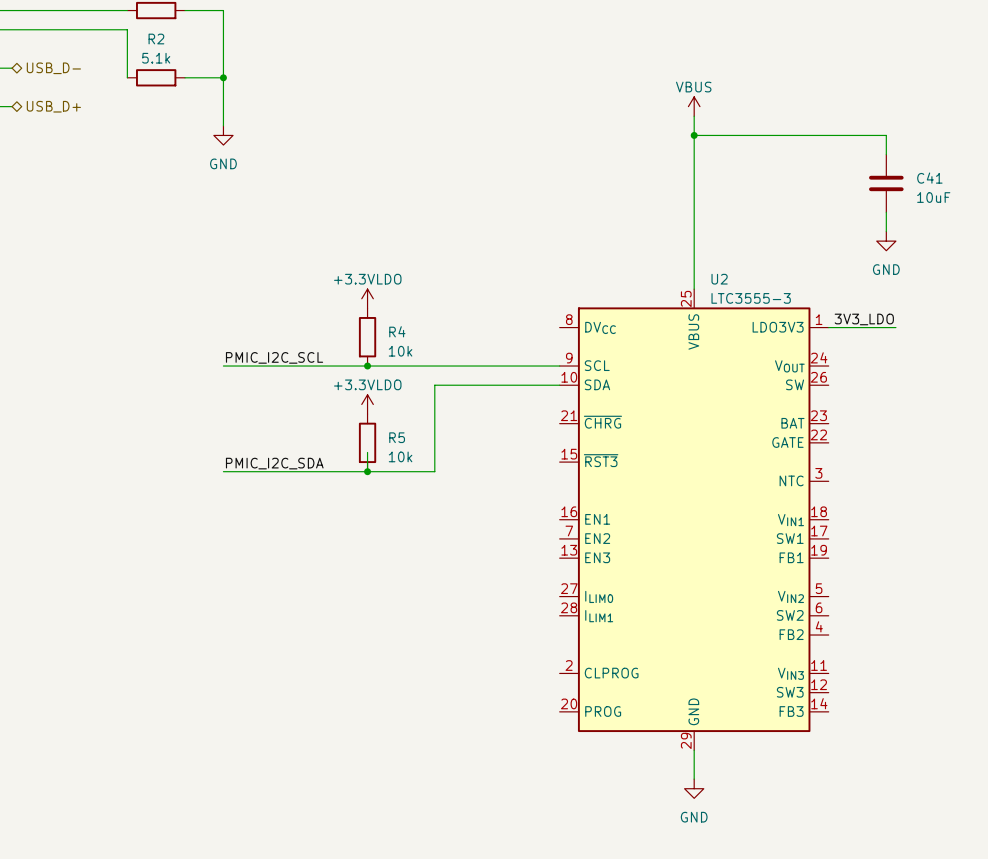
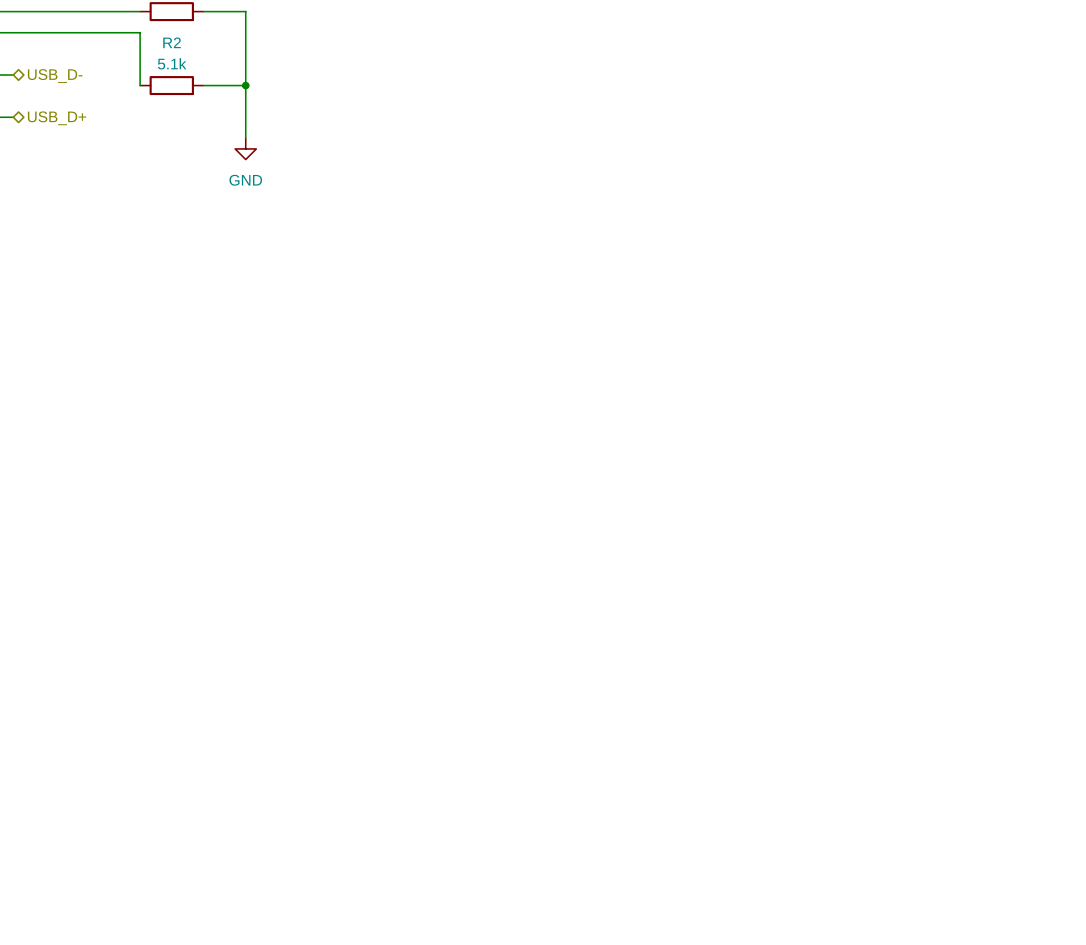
power symbol: VBUS (694, 106) -> none
wire: (694, 116) (694, 289) -> none
wire: (694, 135) (886, 135) (886, 154) -> none
junction: (694, 135) -> none
C41: 10uF (886, 183) -> none
wire: (886, 212) (886, 231) -> none
power symbol: GND (886, 241) -> none
power symbol: +3.3VLDO (367, 298) -> none
label: 3V3_LDO (864, 319) -> none
wire: (828, 327) (895, 327) -> none
R4: 10k (367, 337) -> none
label: PMIC_I2C_SCL (274, 357) -> none
wire: (223, 366) (559, 366) -> none
junction: (367, 366) -> none
wire: (559, 385) (434, 385) (434, 471) (223, 471) -> none
power symbol: +3.3VLDO (367, 404) -> none
R5: 10k (367, 442) -> none
wire: (367, 452) (367, 471) -> none
label: PMIC_I2C_SDA (274, 463) -> none
junction: (367, 471) -> none
U2: LTC3555-3 (694, 519) -> none
wire: (694, 750) (694, 779) -> none
power symbol: GND (694, 788) -> none

